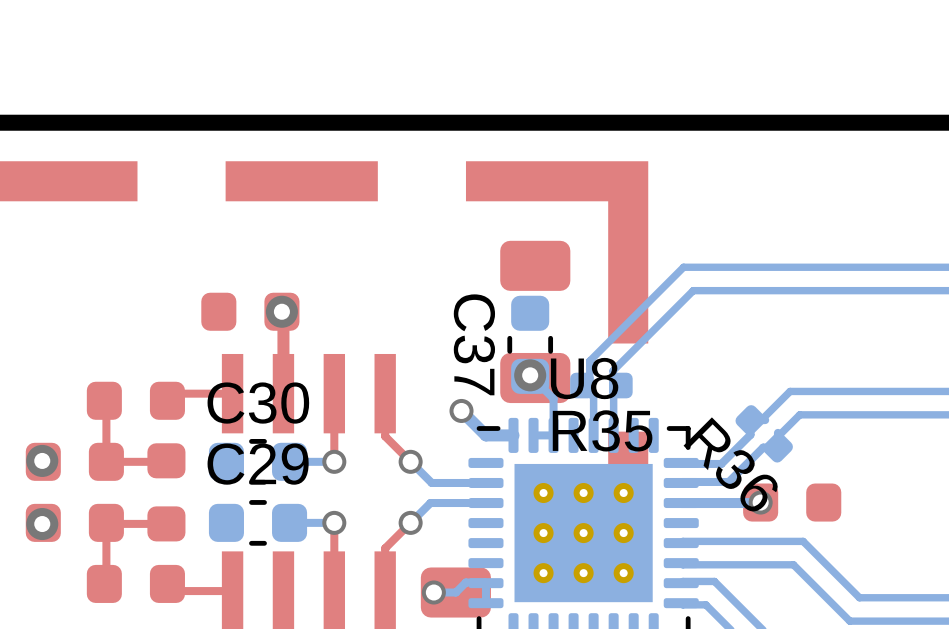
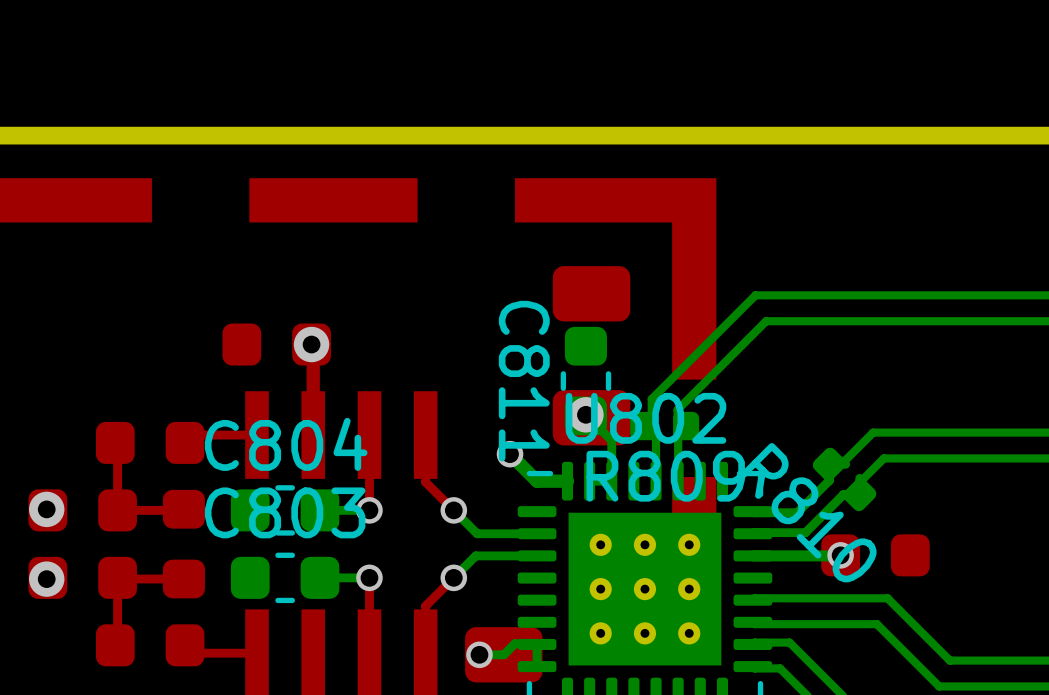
C37 name: C37 (474, 344) -> C811 (524, 381)
U8 name: U8 (584, 378) -> U802 (646, 418)
C30 name: C30 (258, 403) -> C804 (286, 444)
R35 name: R35 (602, 430) -> R809 (665, 476)
C29 name: C29 (258, 464) -> C803 (285, 512)
R36 name: R36 (731, 464) -> R810 (806, 512)

